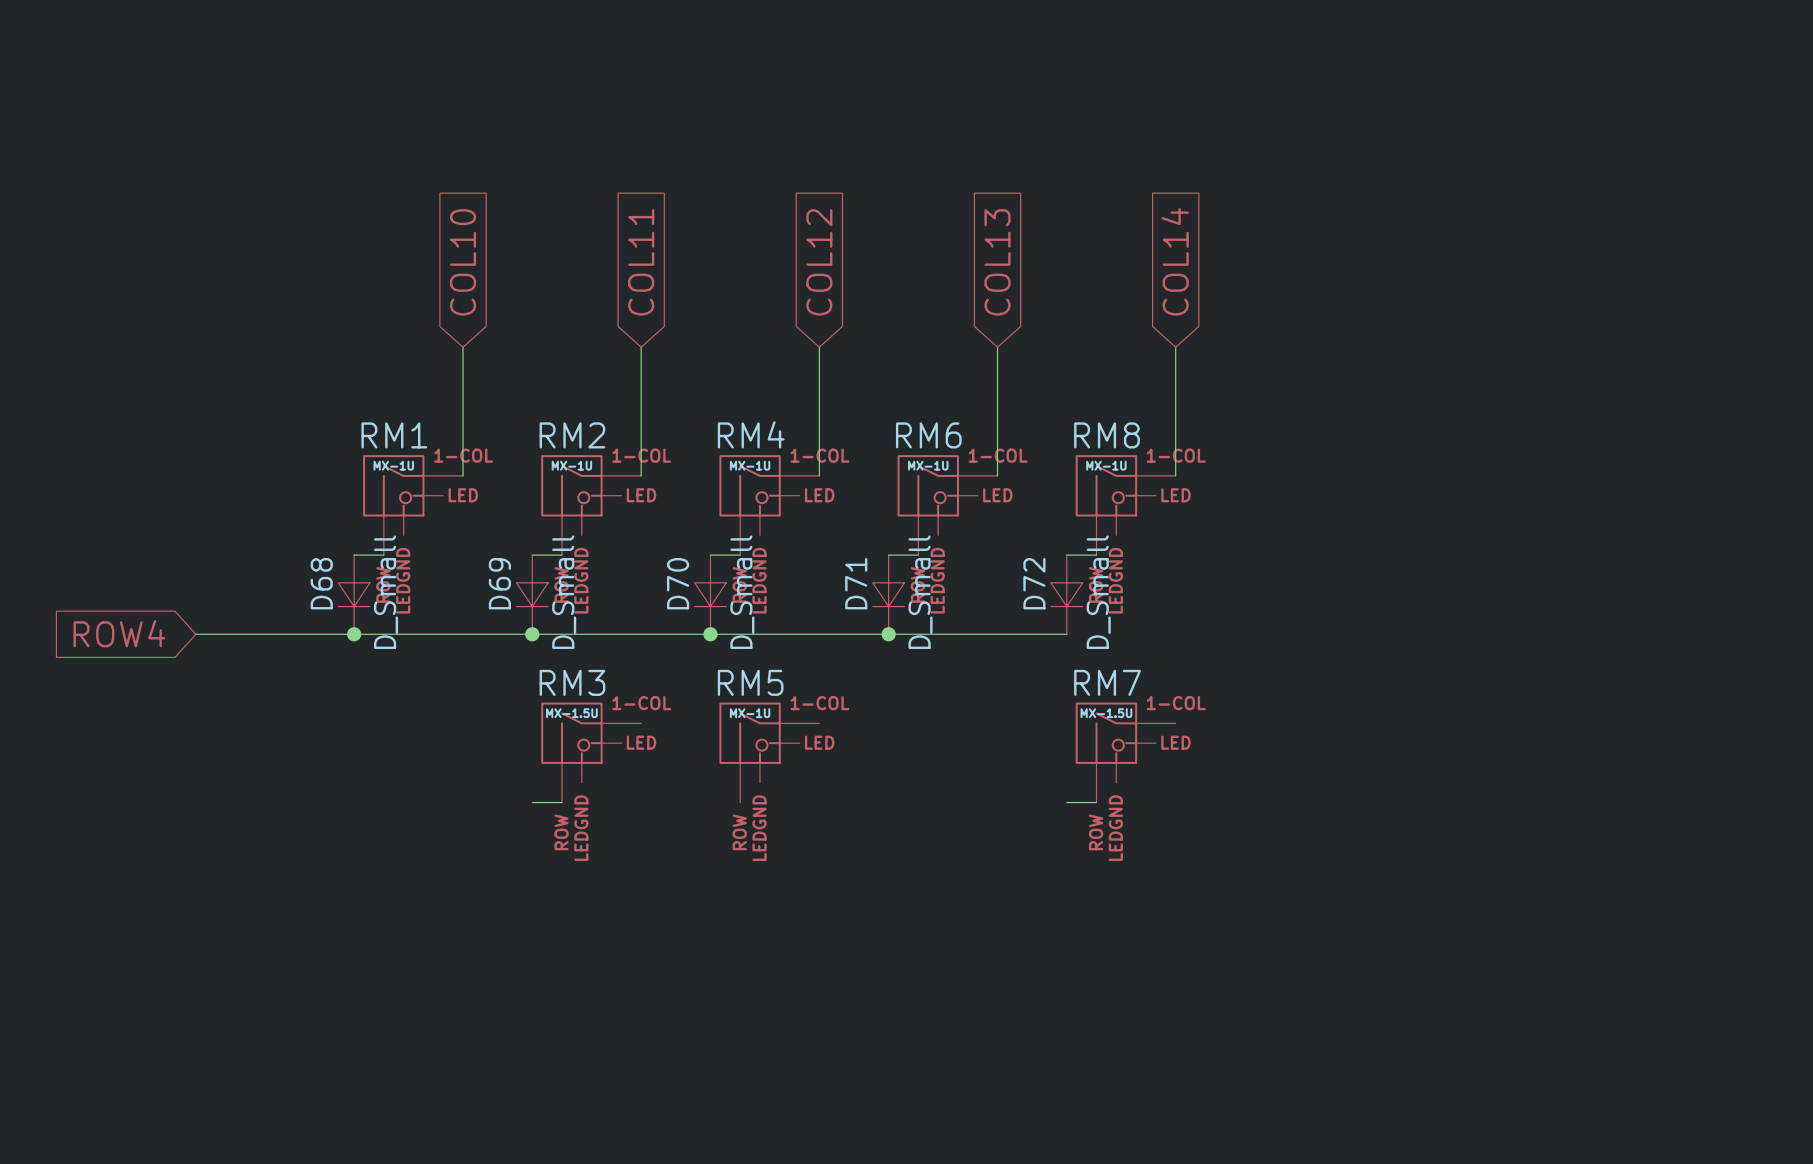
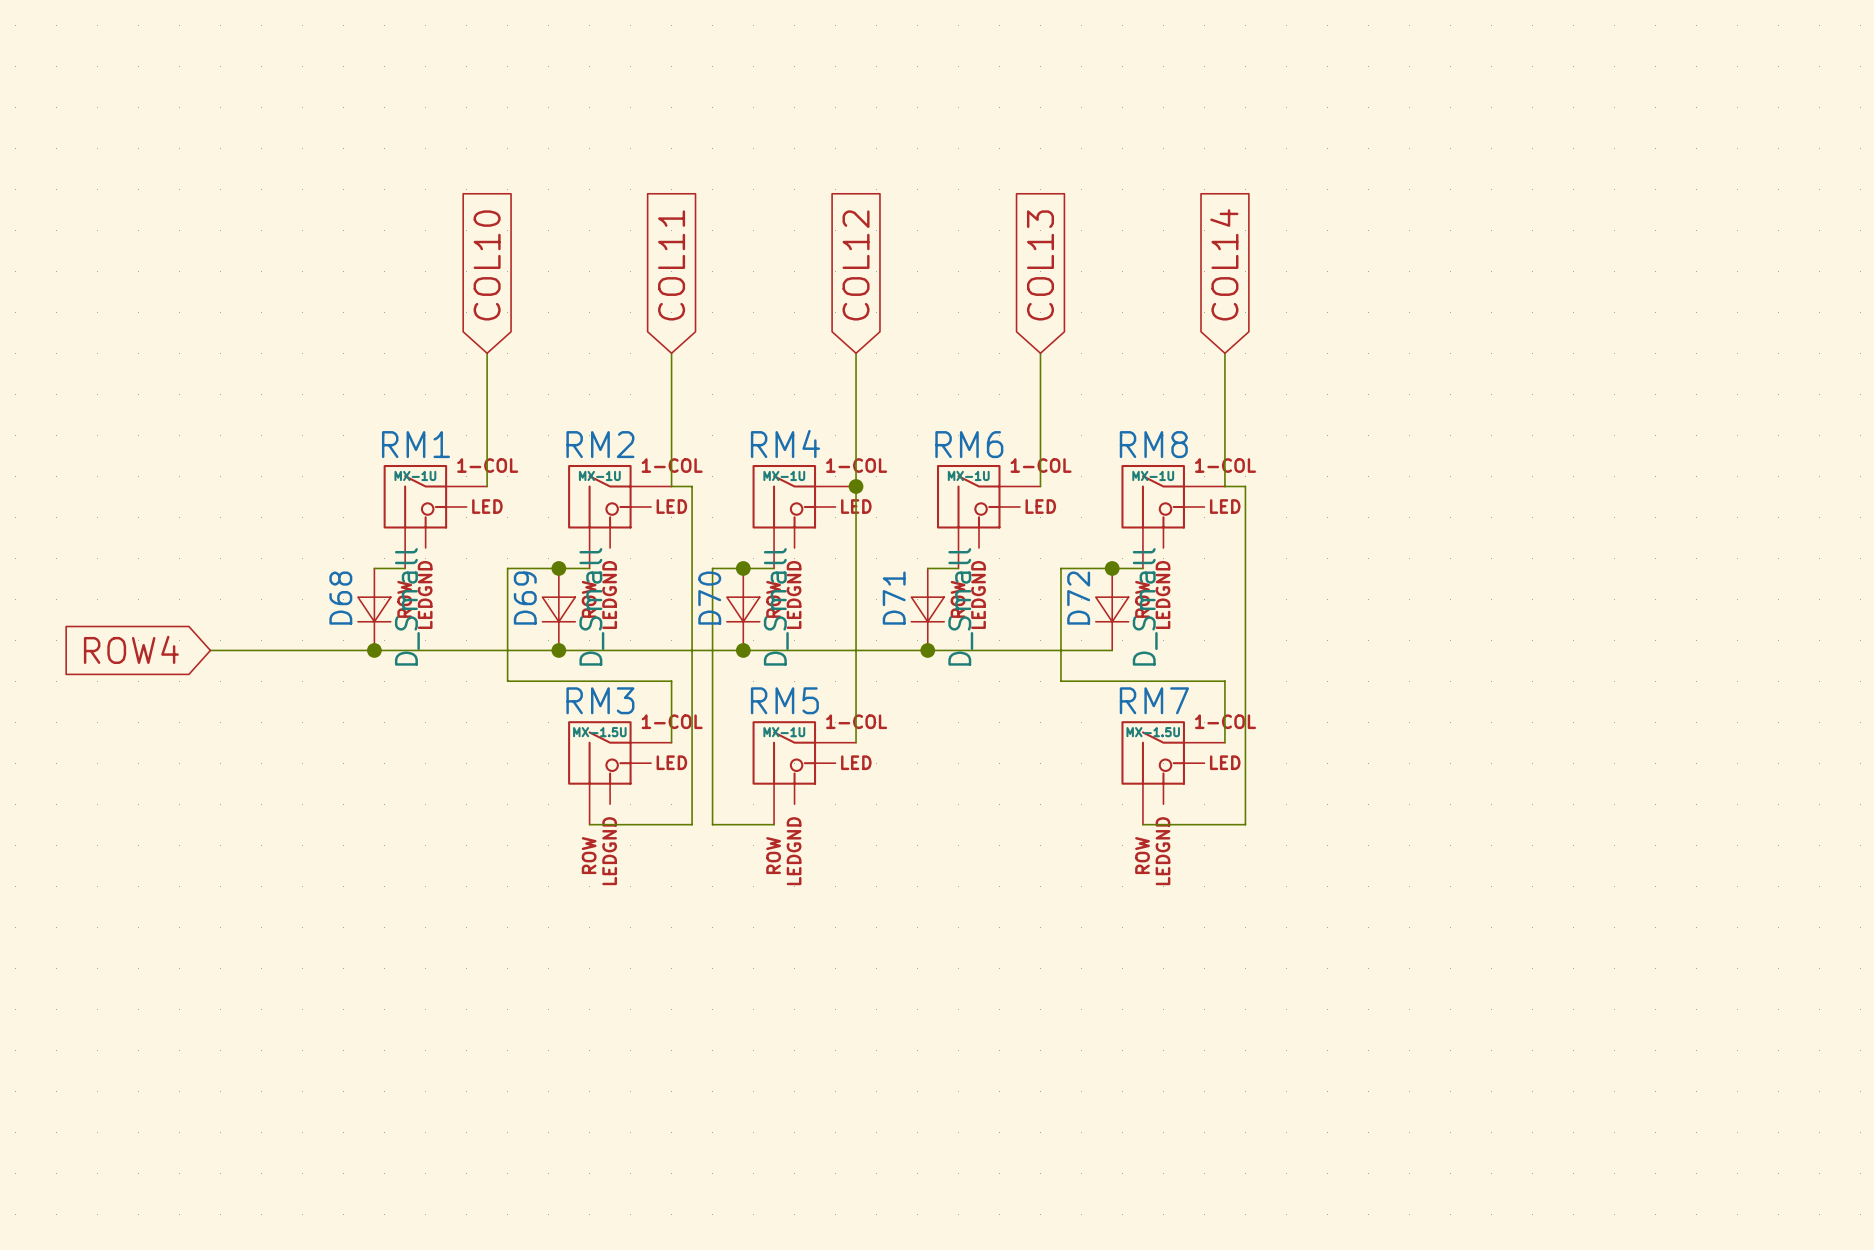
wire: none -> (856, 486) (856, 742)
junction: none -> (856, 486)
wire: none -> (558, 568) (507, 568) (507, 681) (671, 681) (671, 742)
junction: none -> (558, 568)
wire: none -> (743, 568) (712, 568) (712, 824) (774, 824)
junction: none -> (743, 568)
wire: none -> (1112, 568) (1060, 568) (1060, 681) (1224, 681) (1224, 742)
junction: none -> (1112, 568)
wire: (532, 802) (562, 802) -> (671, 486) (692, 486) (692, 824) (589, 824)
wire: (1066, 802) (1096, 802) -> (1224, 486) (1245, 486) (1245, 824) (1142, 824)

